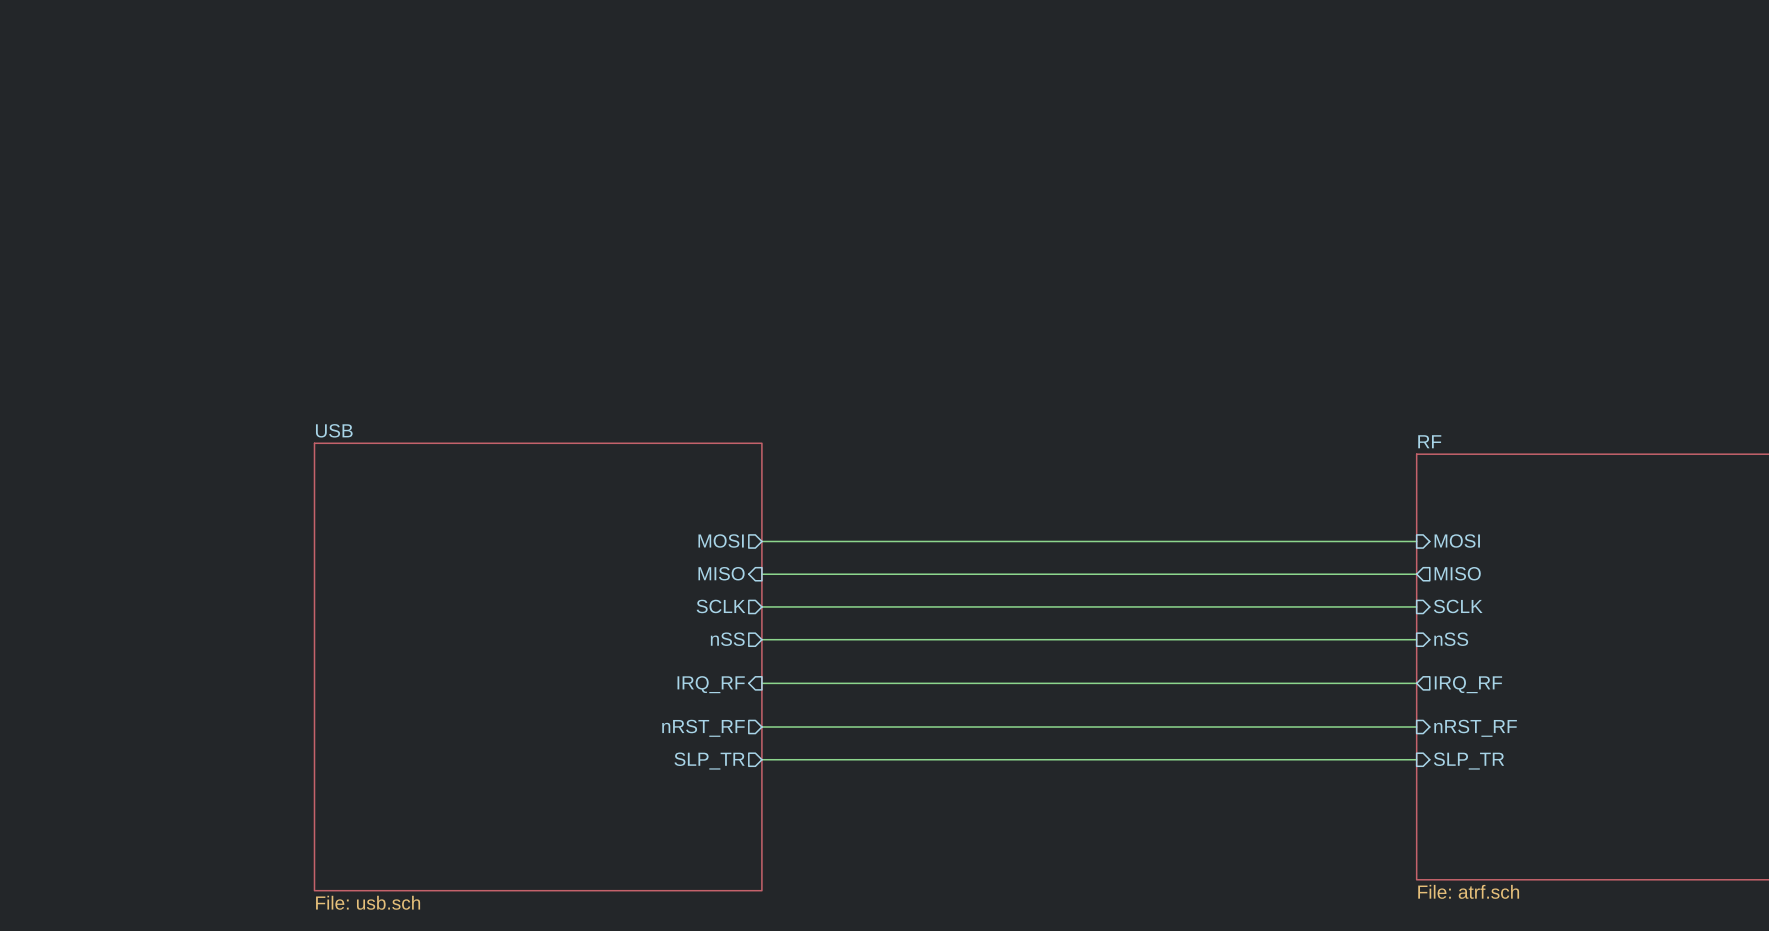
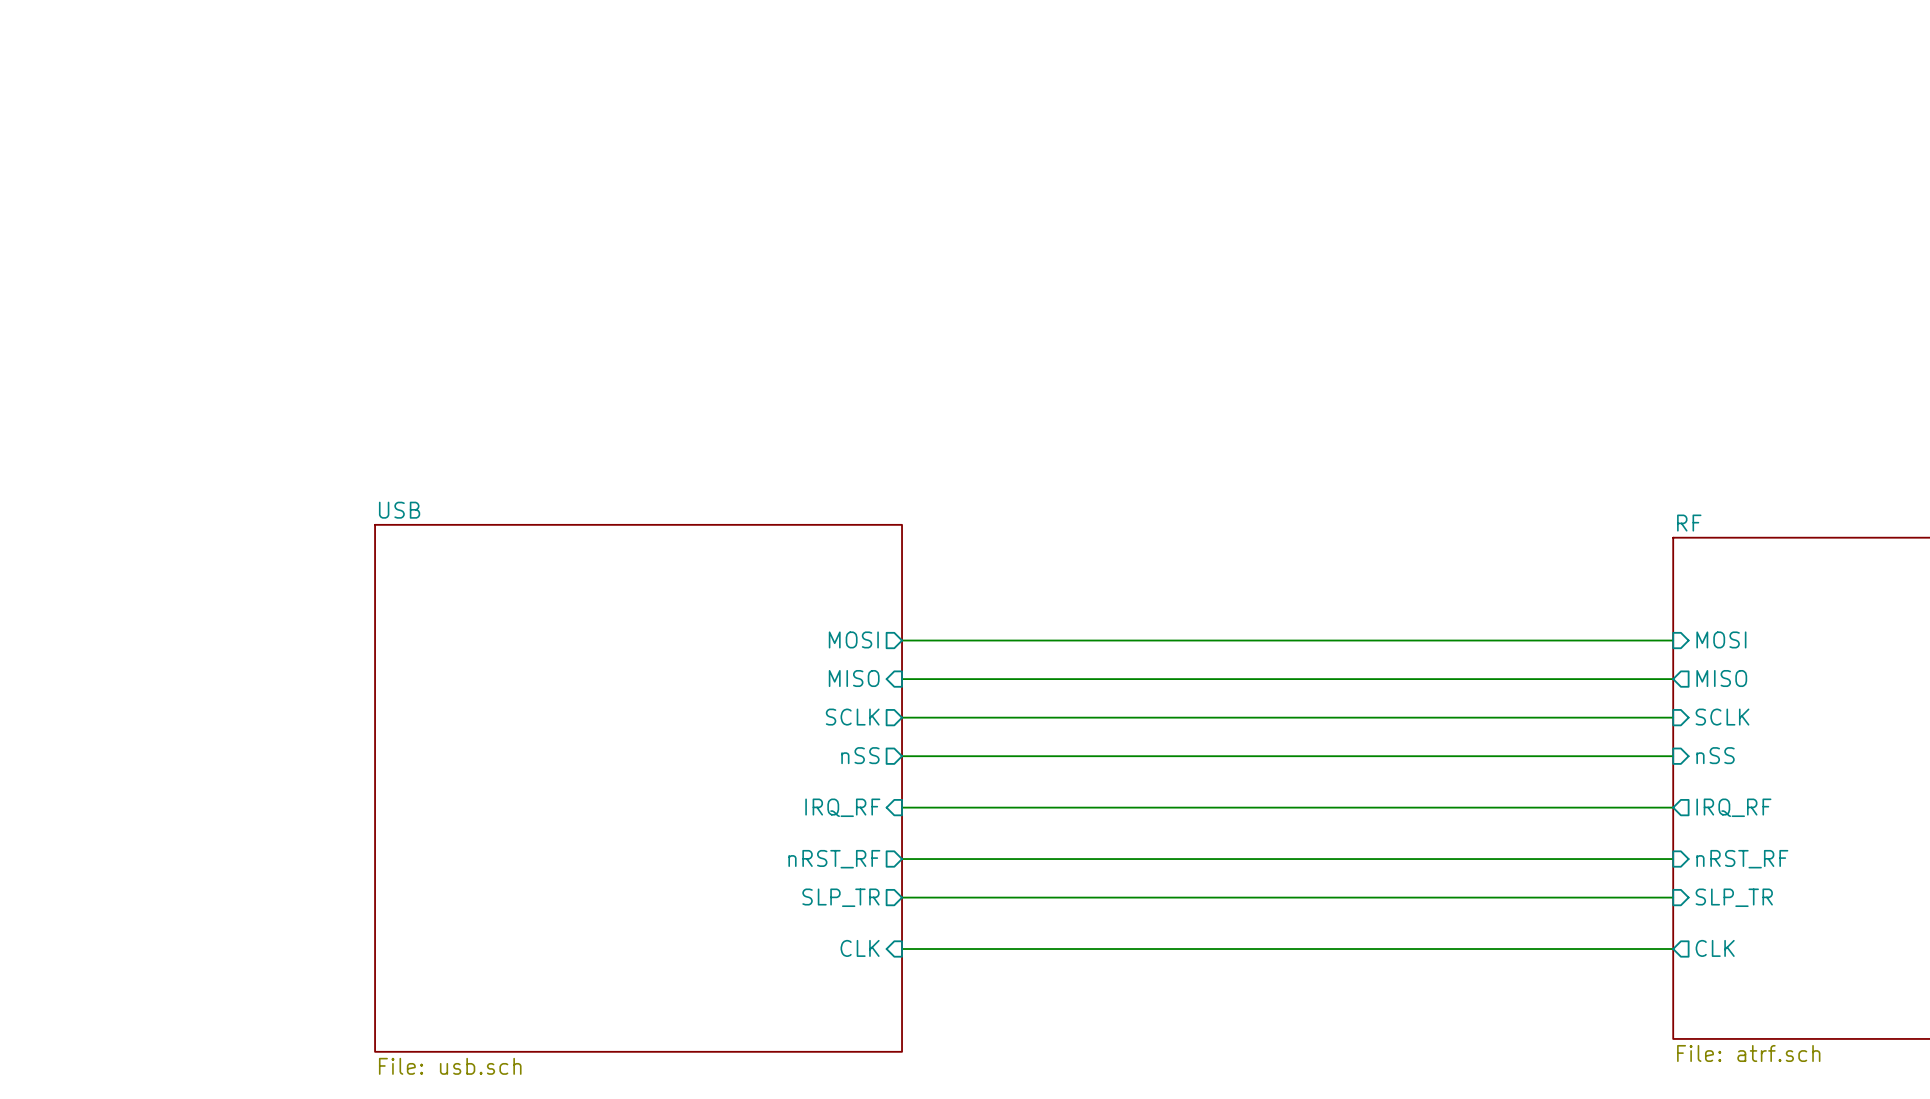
sheet pin: none -> CLK (860, 948)
sheet pin: none -> CLK (1715, 948)
wire: none -> (902, 949) (1673, 949)

